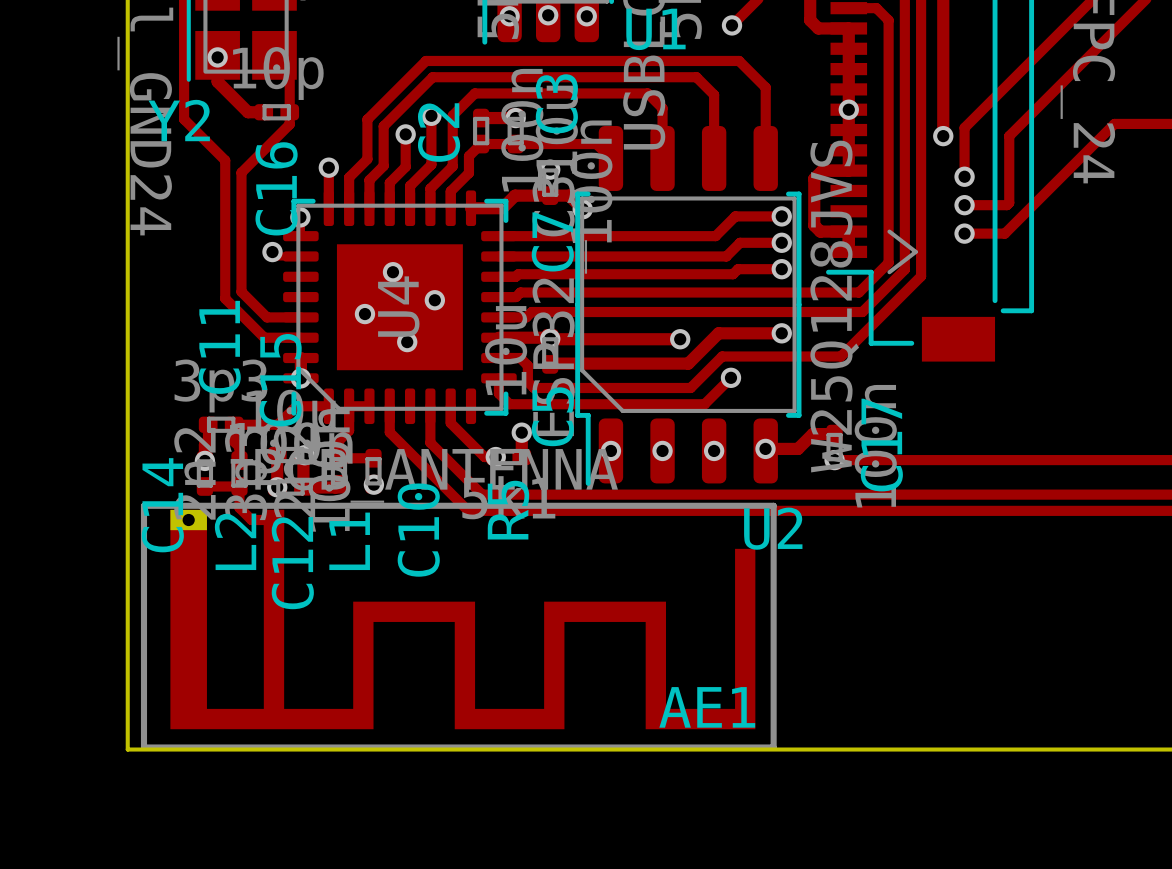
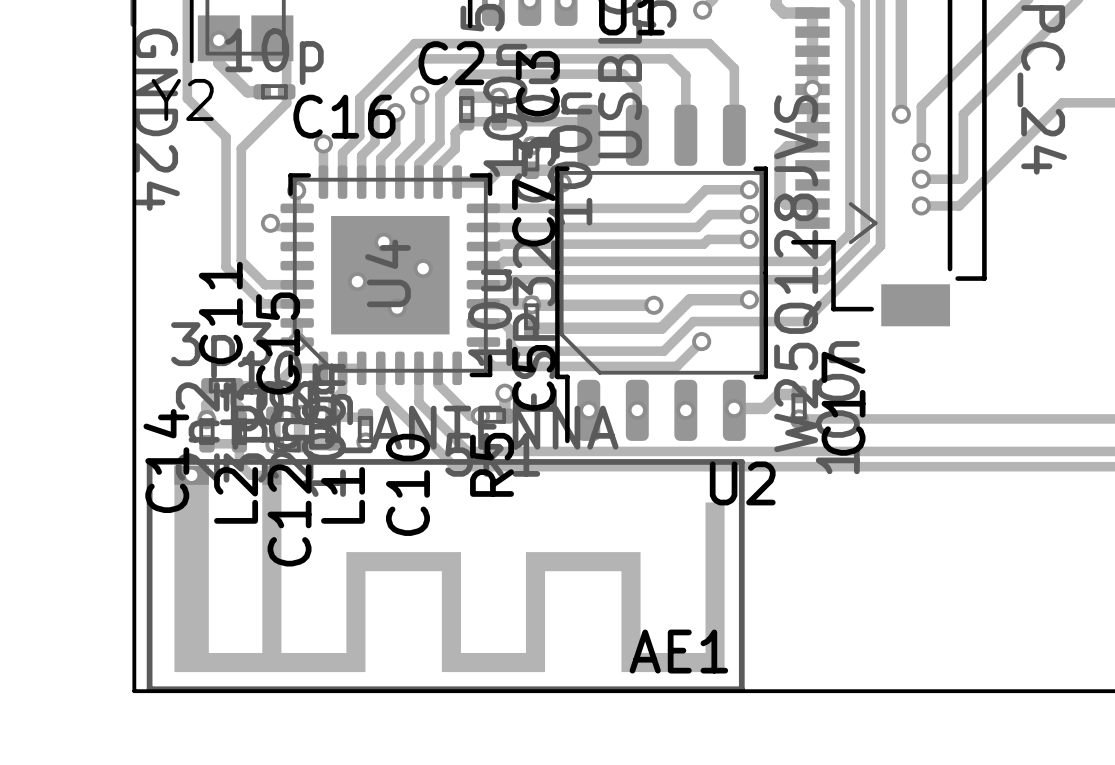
C2 name rotation: 0° (439, 132) -> 90° clockwise (451, 63)
C16 name rotation: 0° (276, 188) -> 90° clockwise (344, 116)

